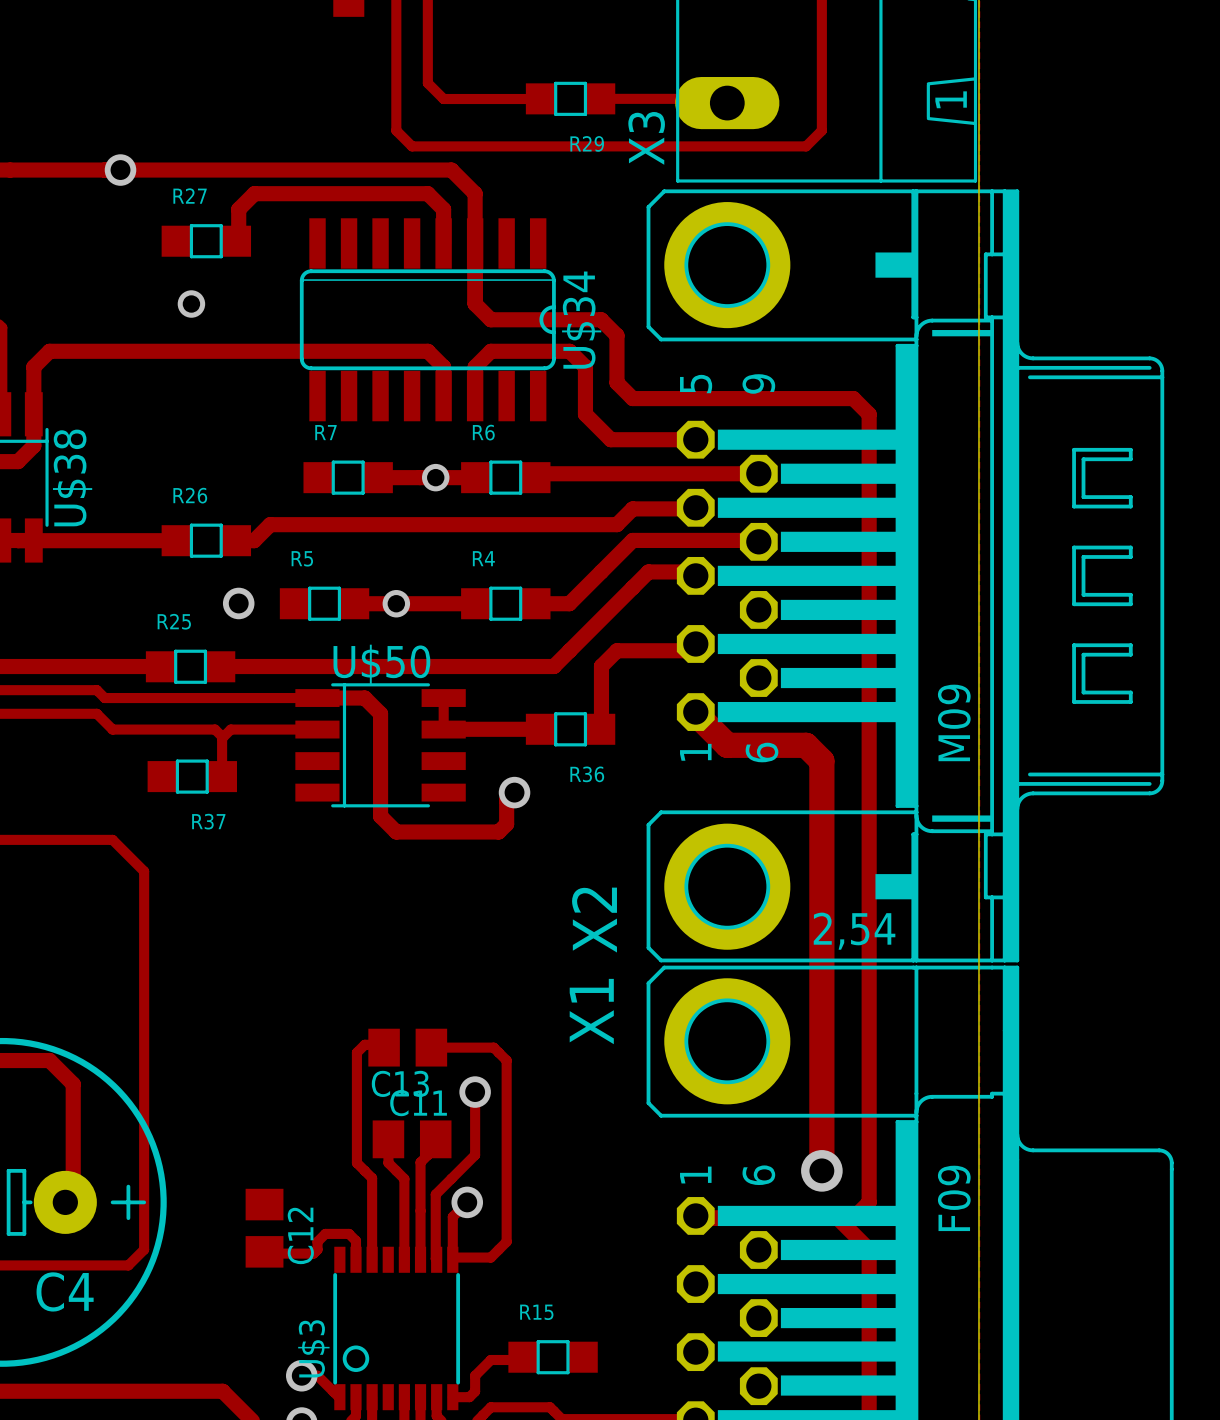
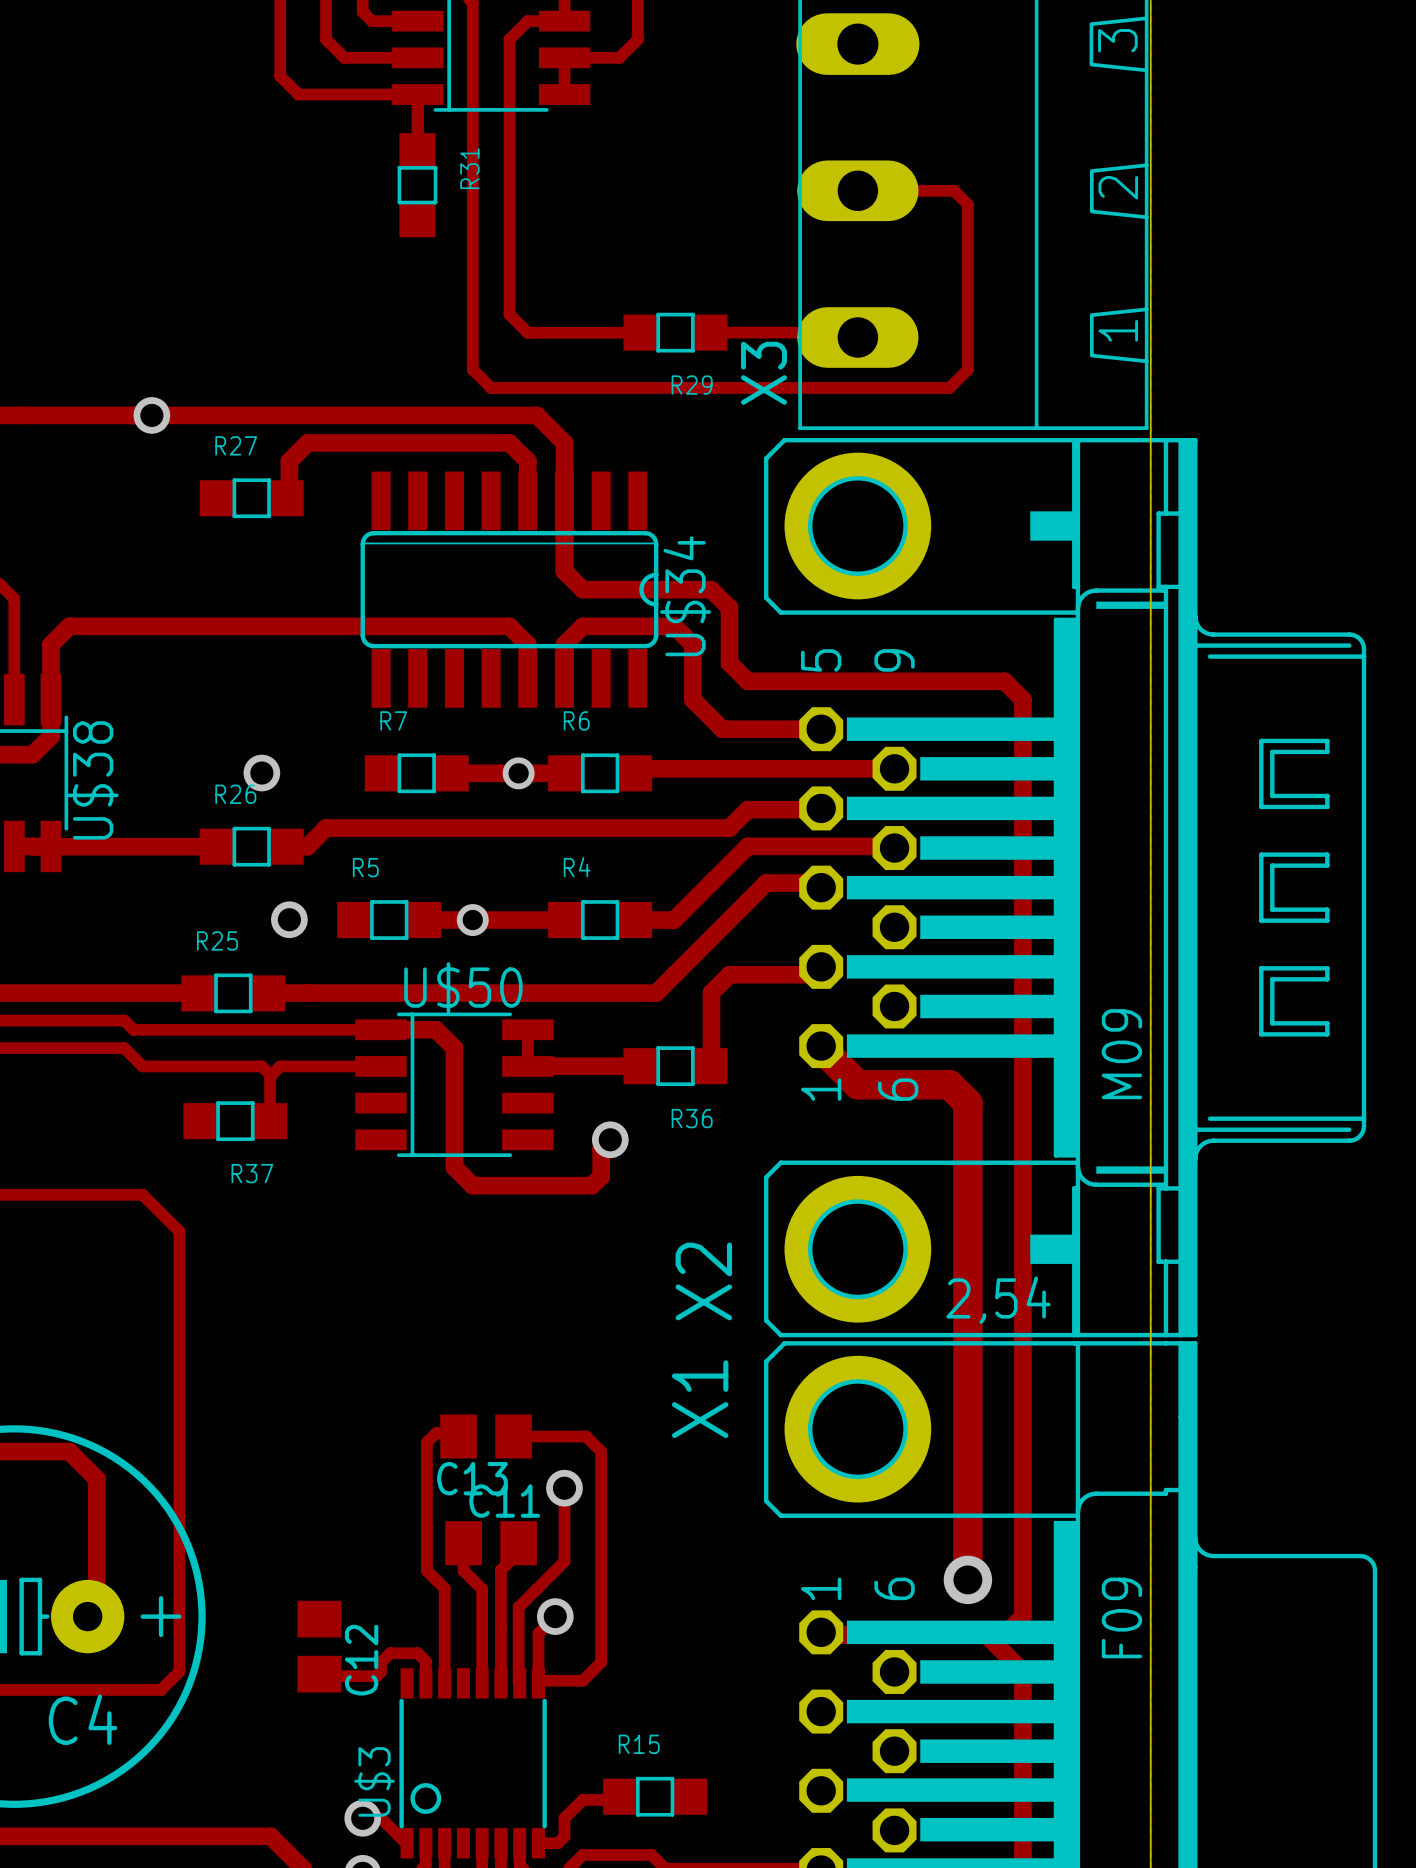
via: (191, 304) -> none
via: none -> (261, 773)

